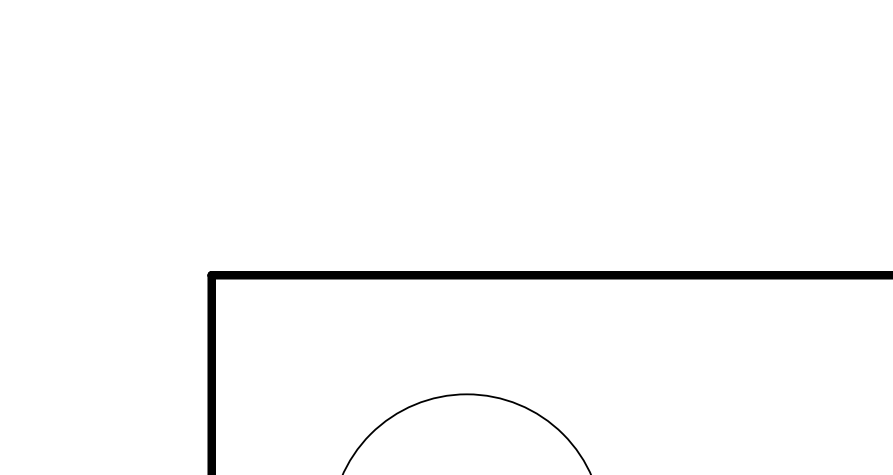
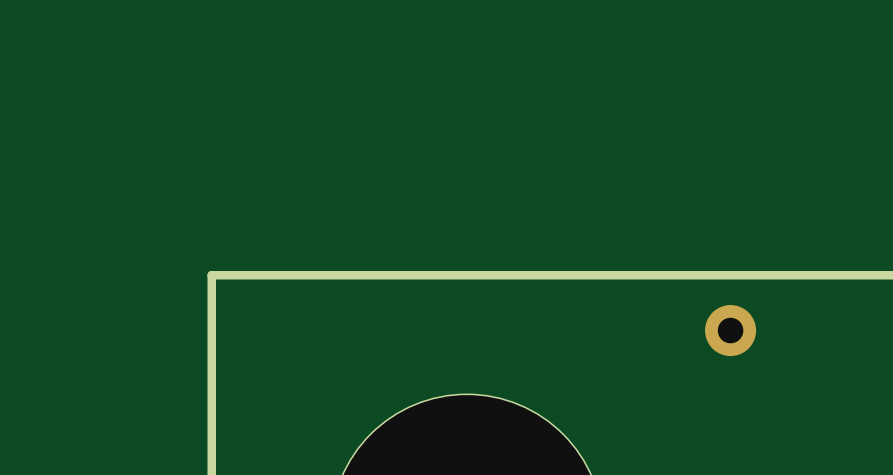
via: none -> (730, 330)

